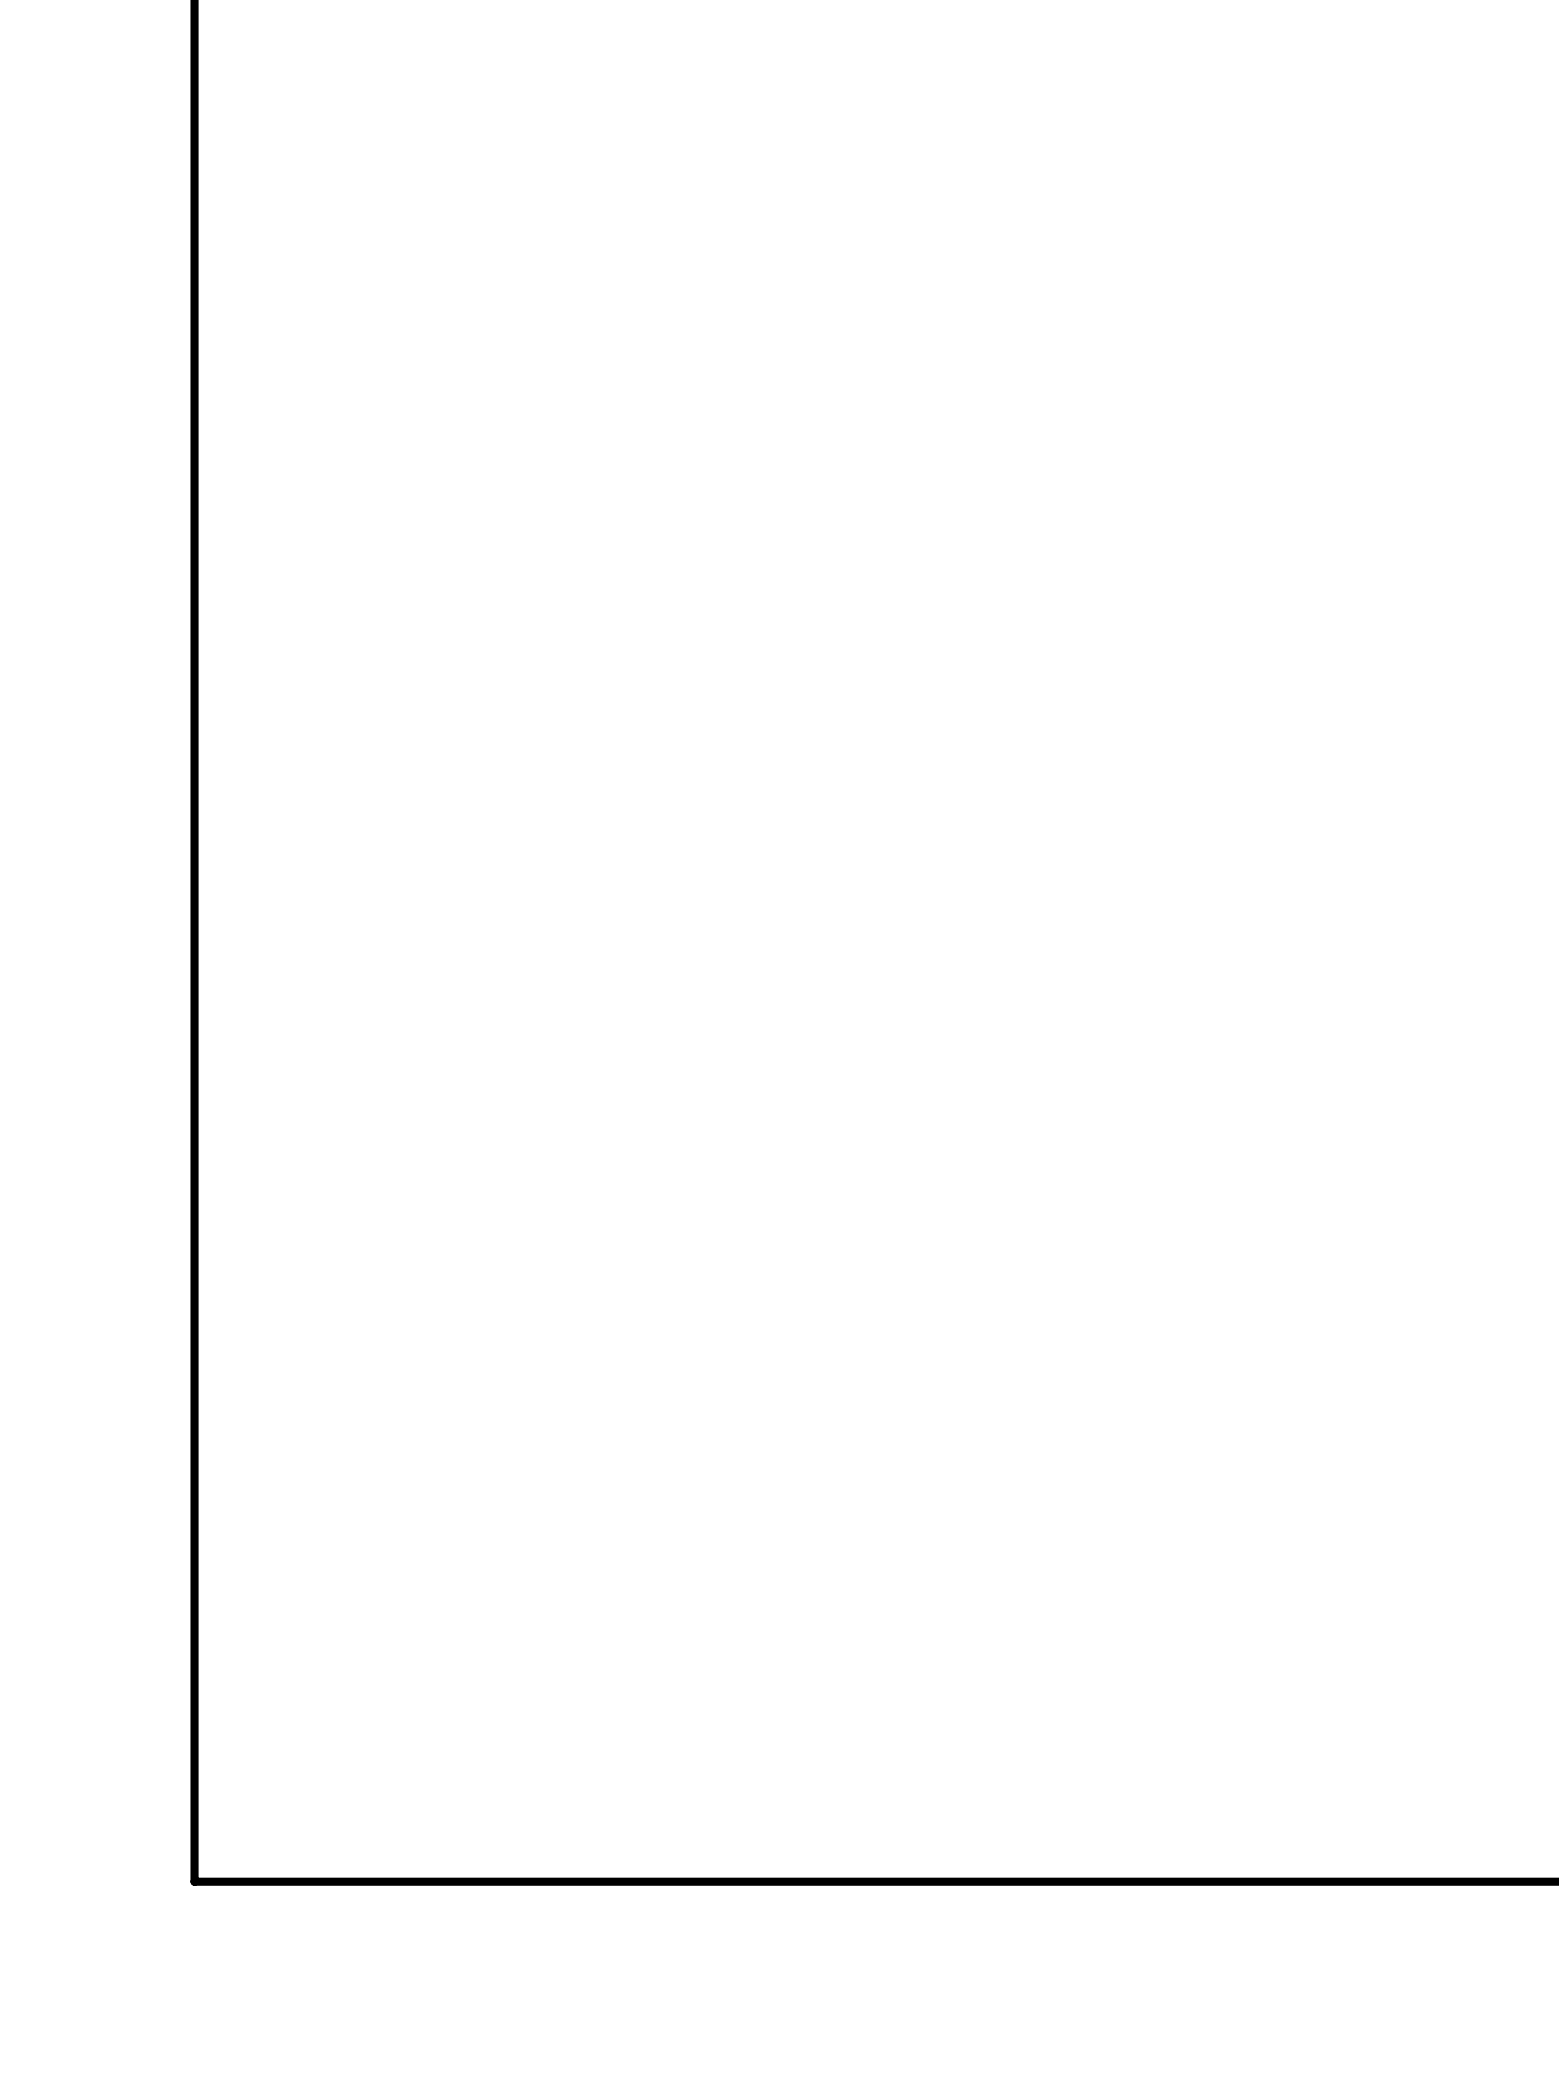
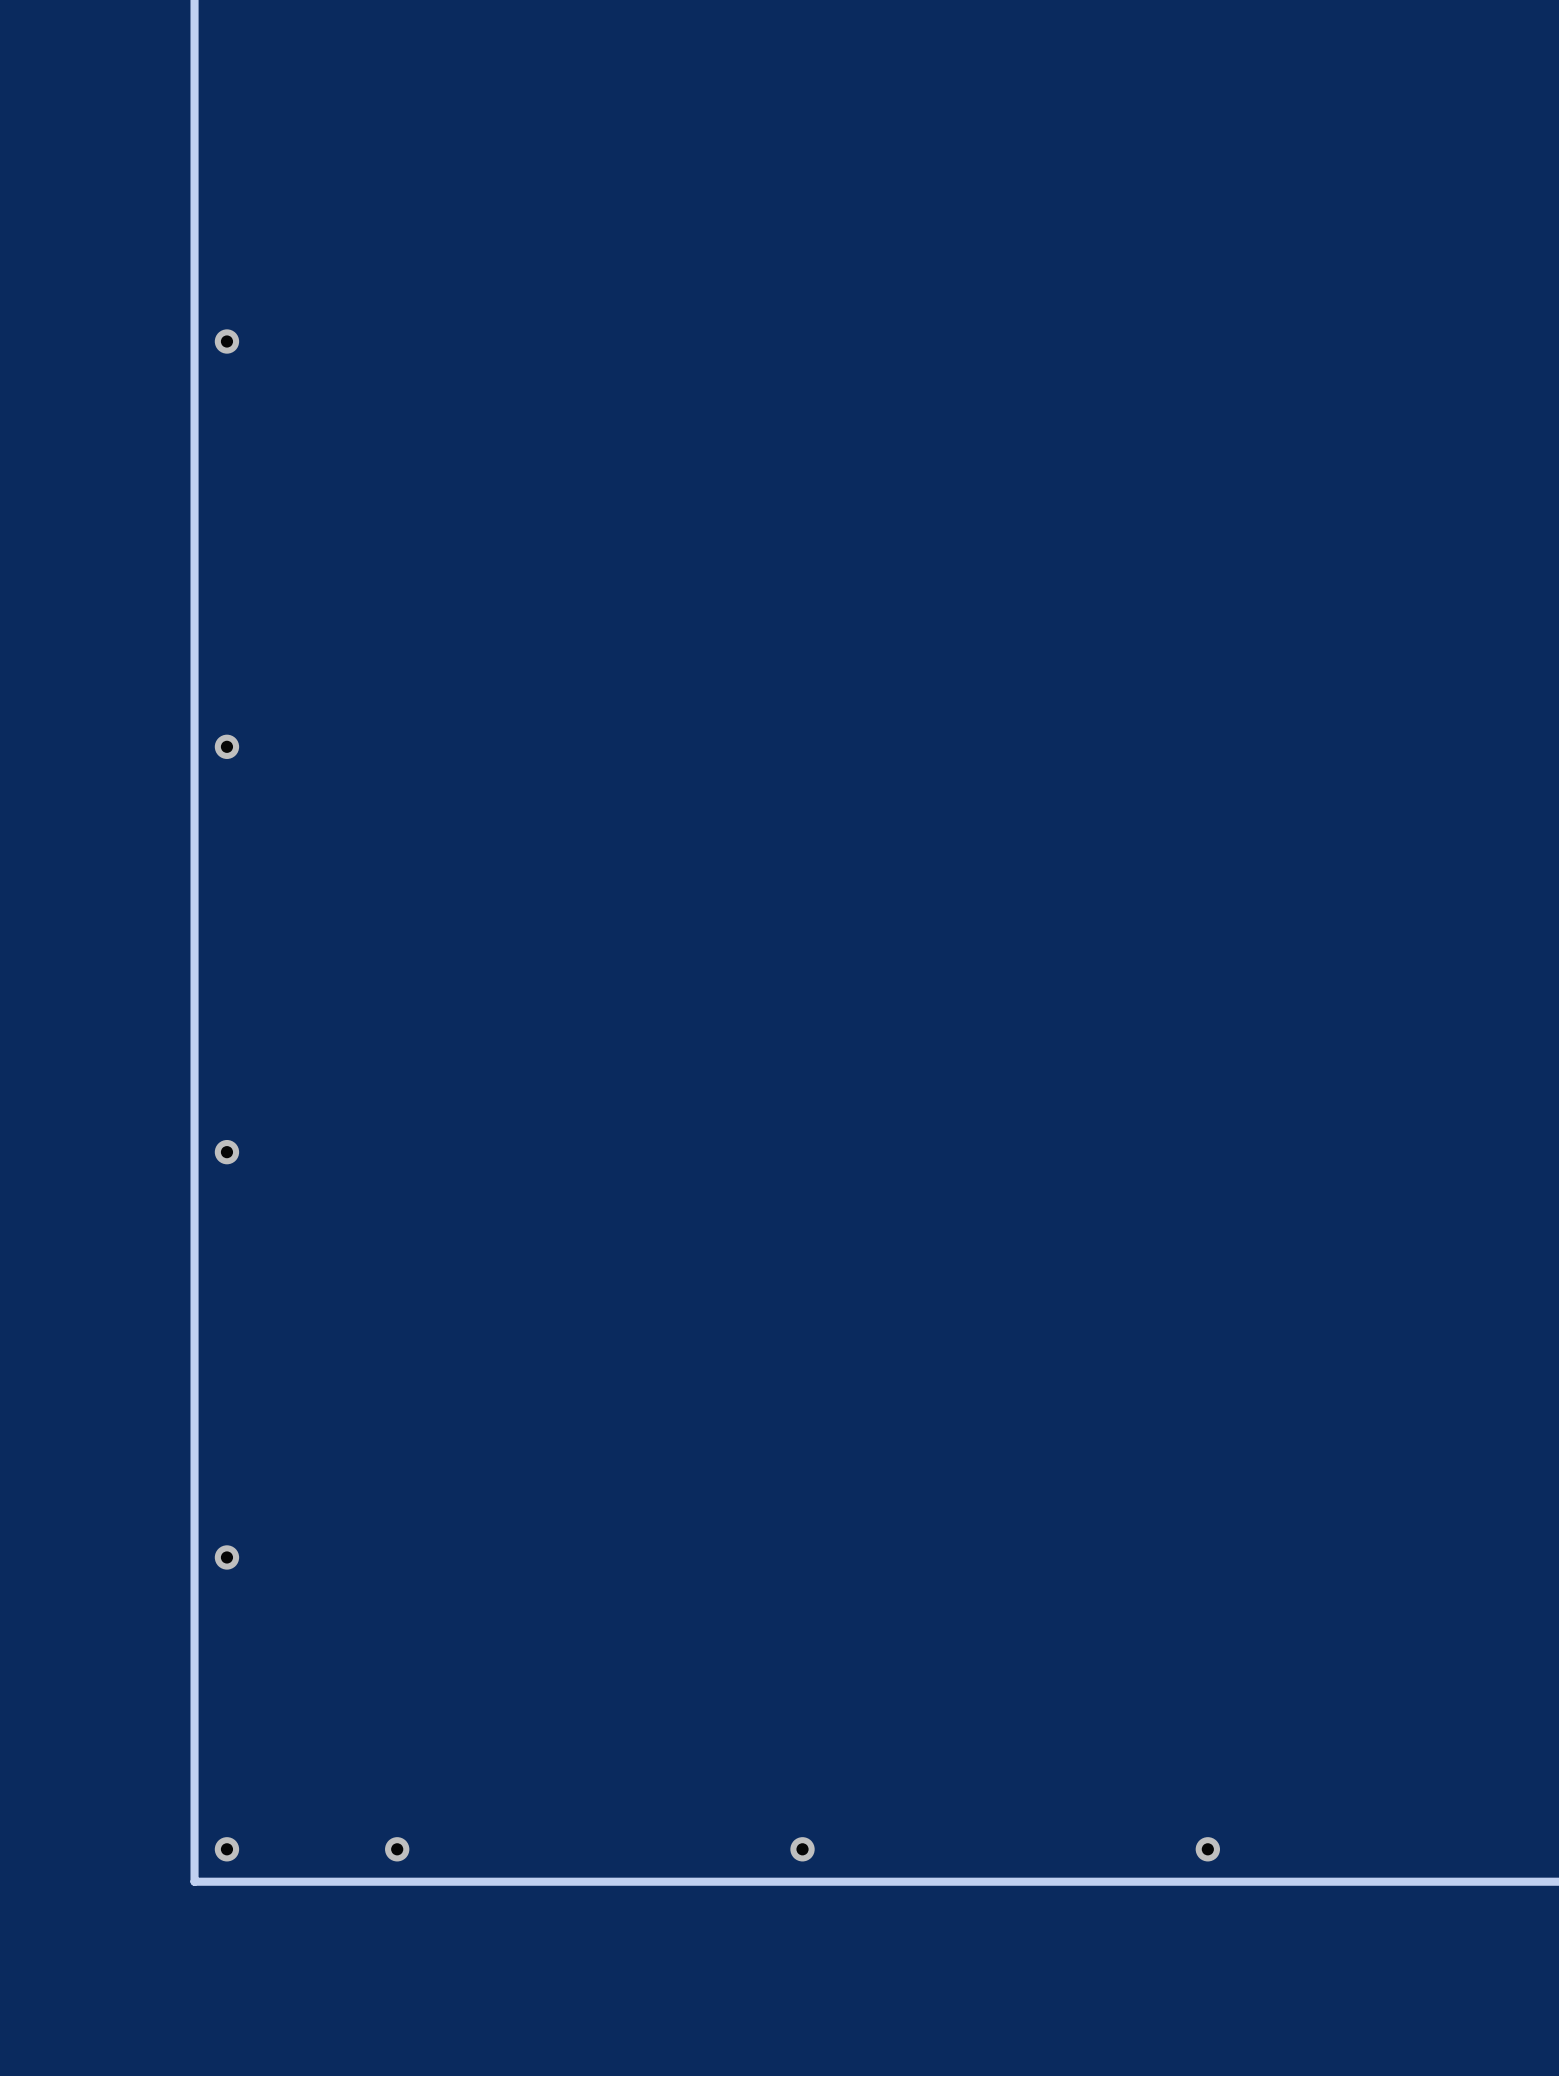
via: none -> (226, 341)
via: none -> (226, 746)
via: none -> (226, 1152)
via: none -> (226, 1557)
via: none -> (226, 1849)
via: none -> (397, 1849)
via: none -> (802, 1849)
via: none -> (1207, 1849)

